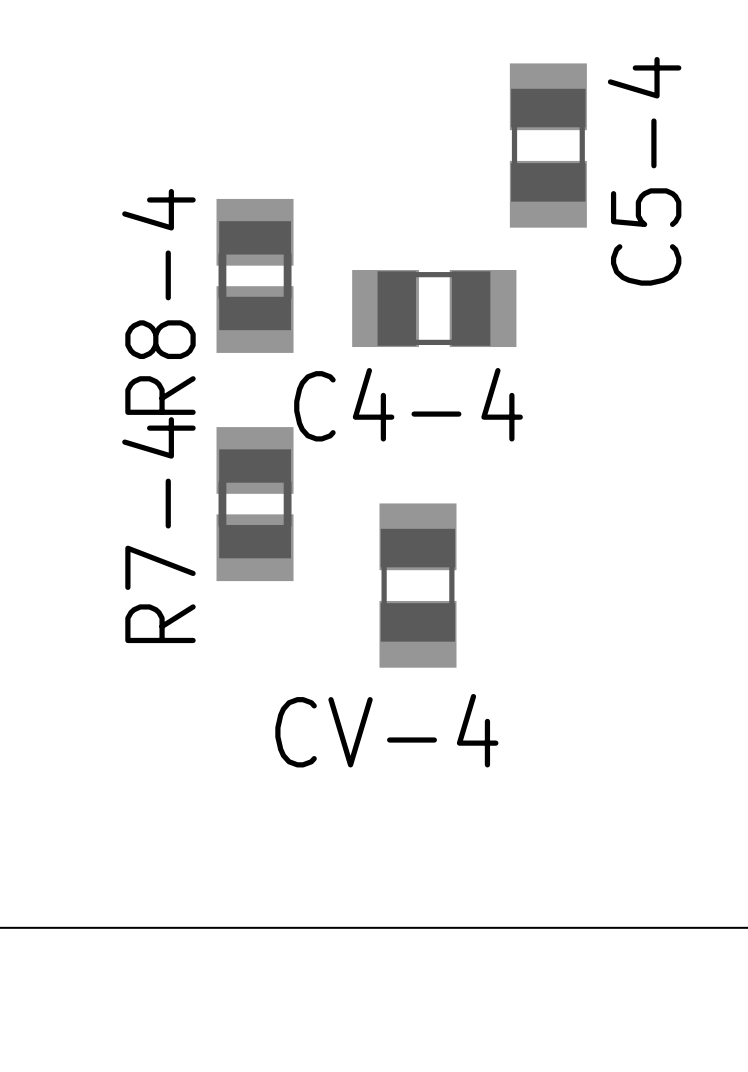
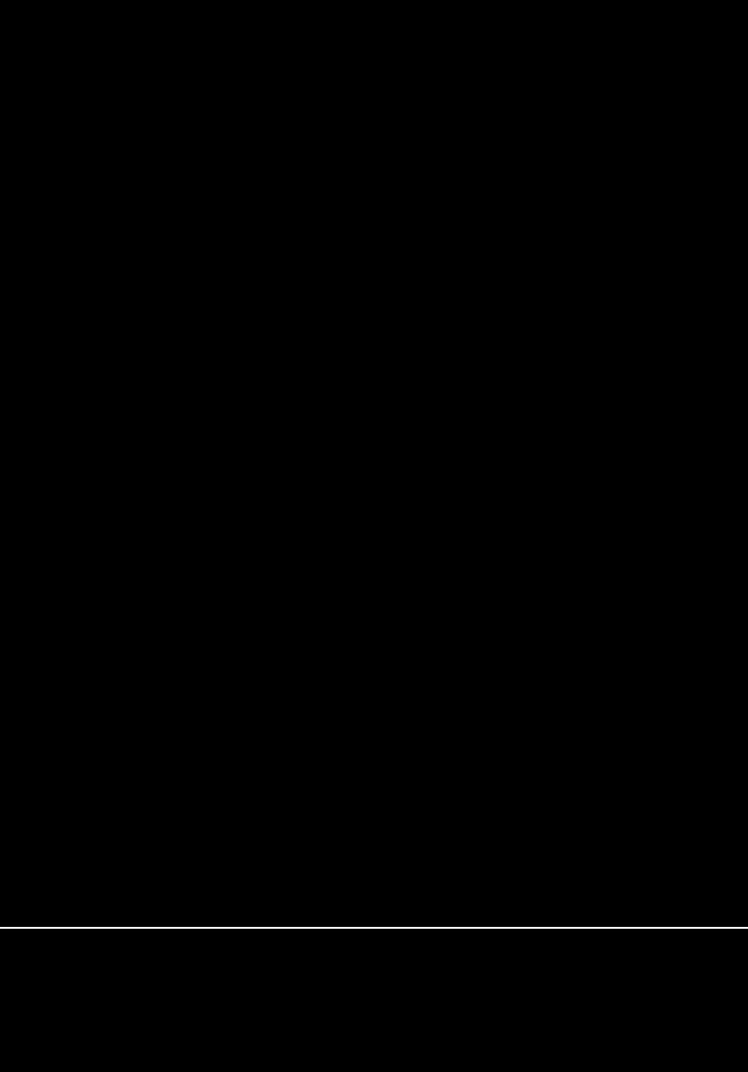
C5-4: (548, 145) -> none
R8-4: (255, 275) -> none
C4-4: (434, 308) -> none
R7-4: (255, 504) -> none
CV-4: (417, 585) -> none

